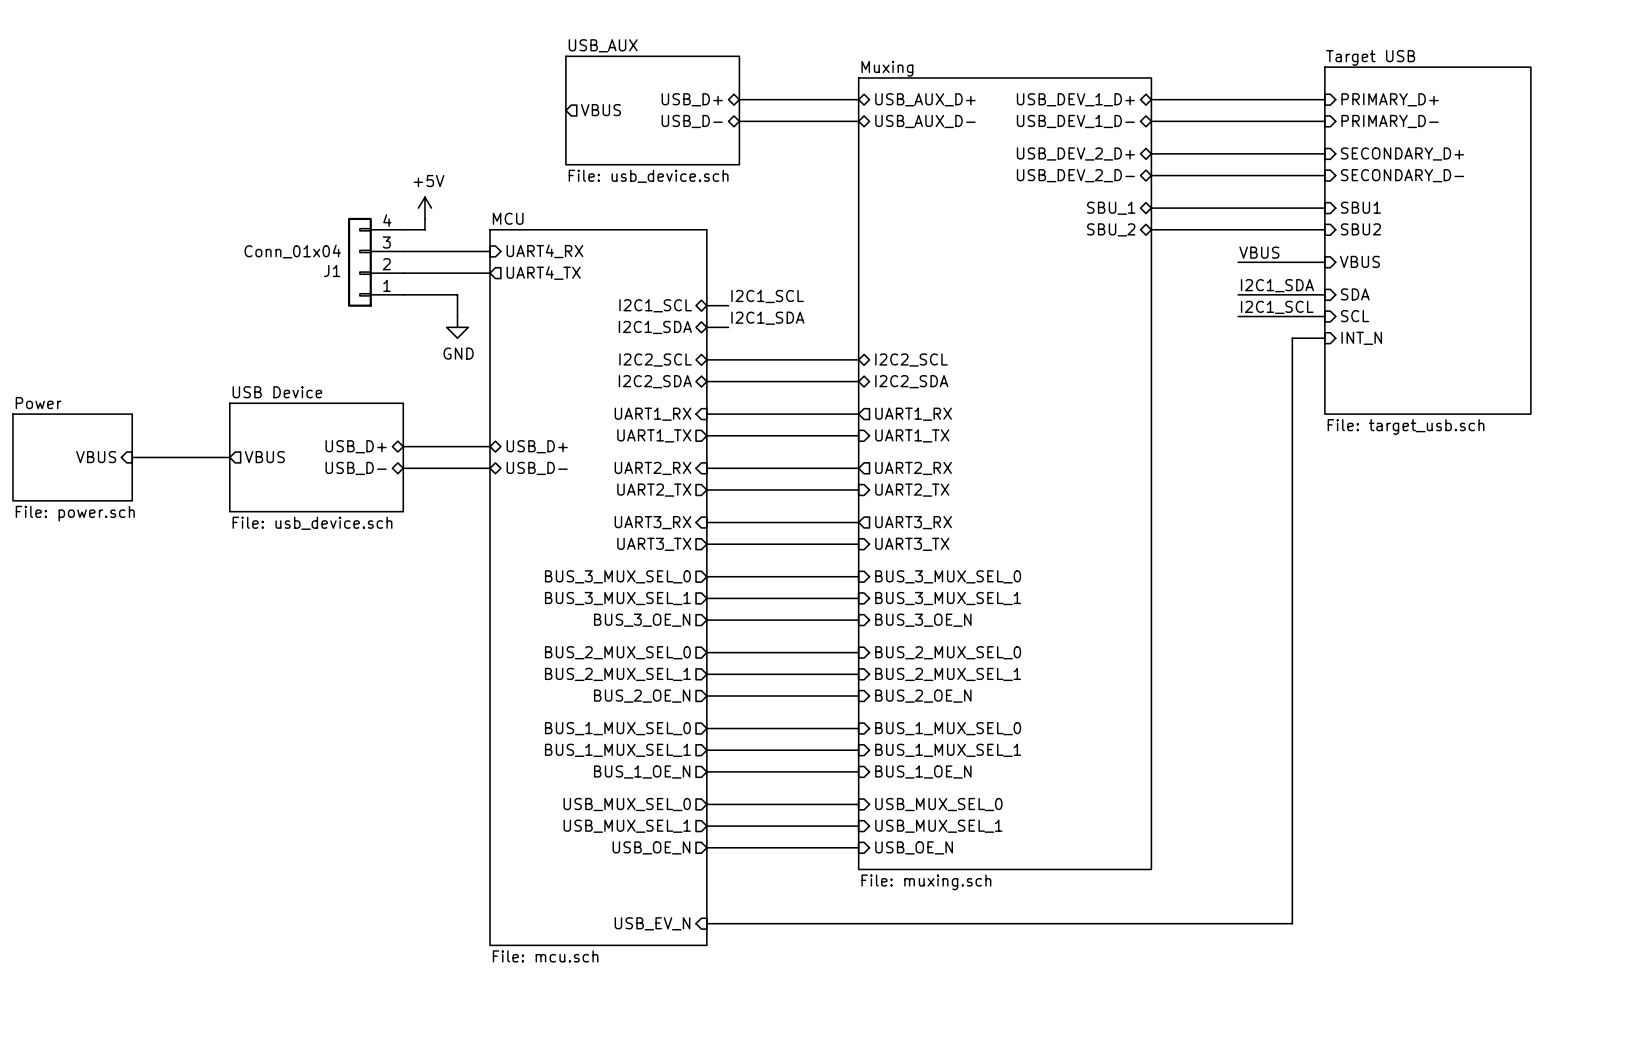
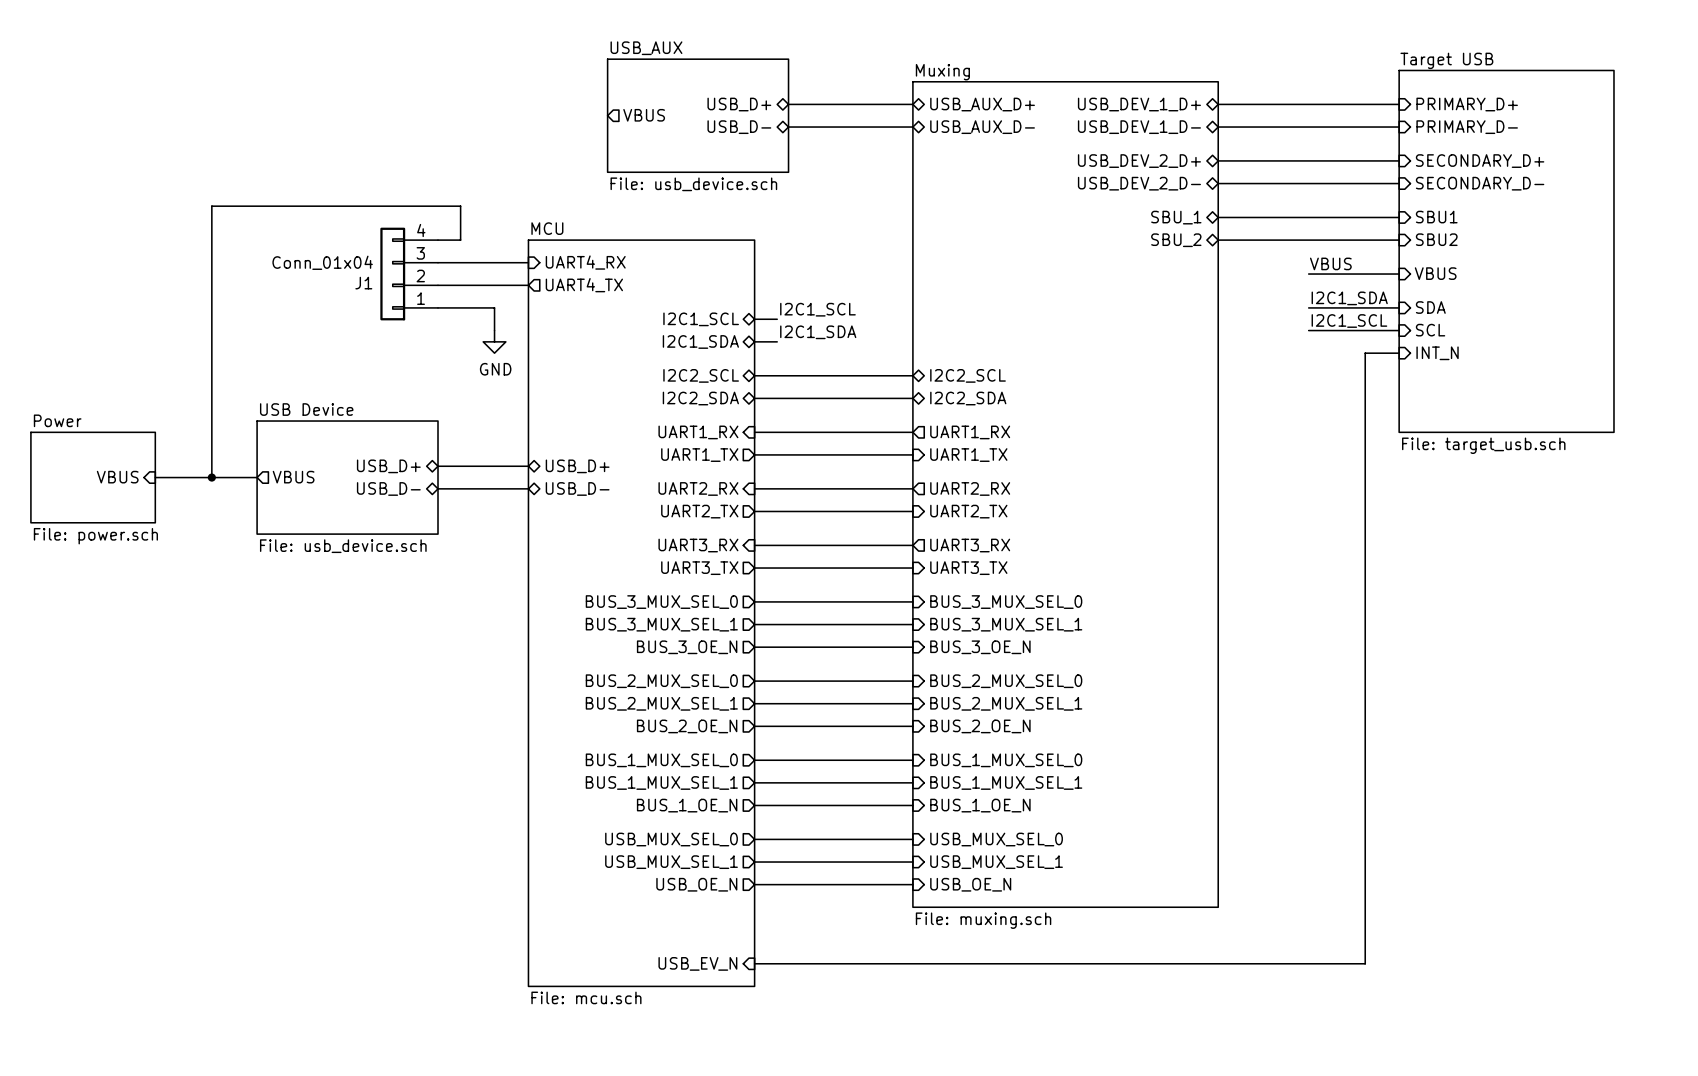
power symbol: +5V (424, 208) -> none
wire: none -> (460, 228) (460, 206) (211, 206) (211, 477)
junction: none -> (211, 477)

